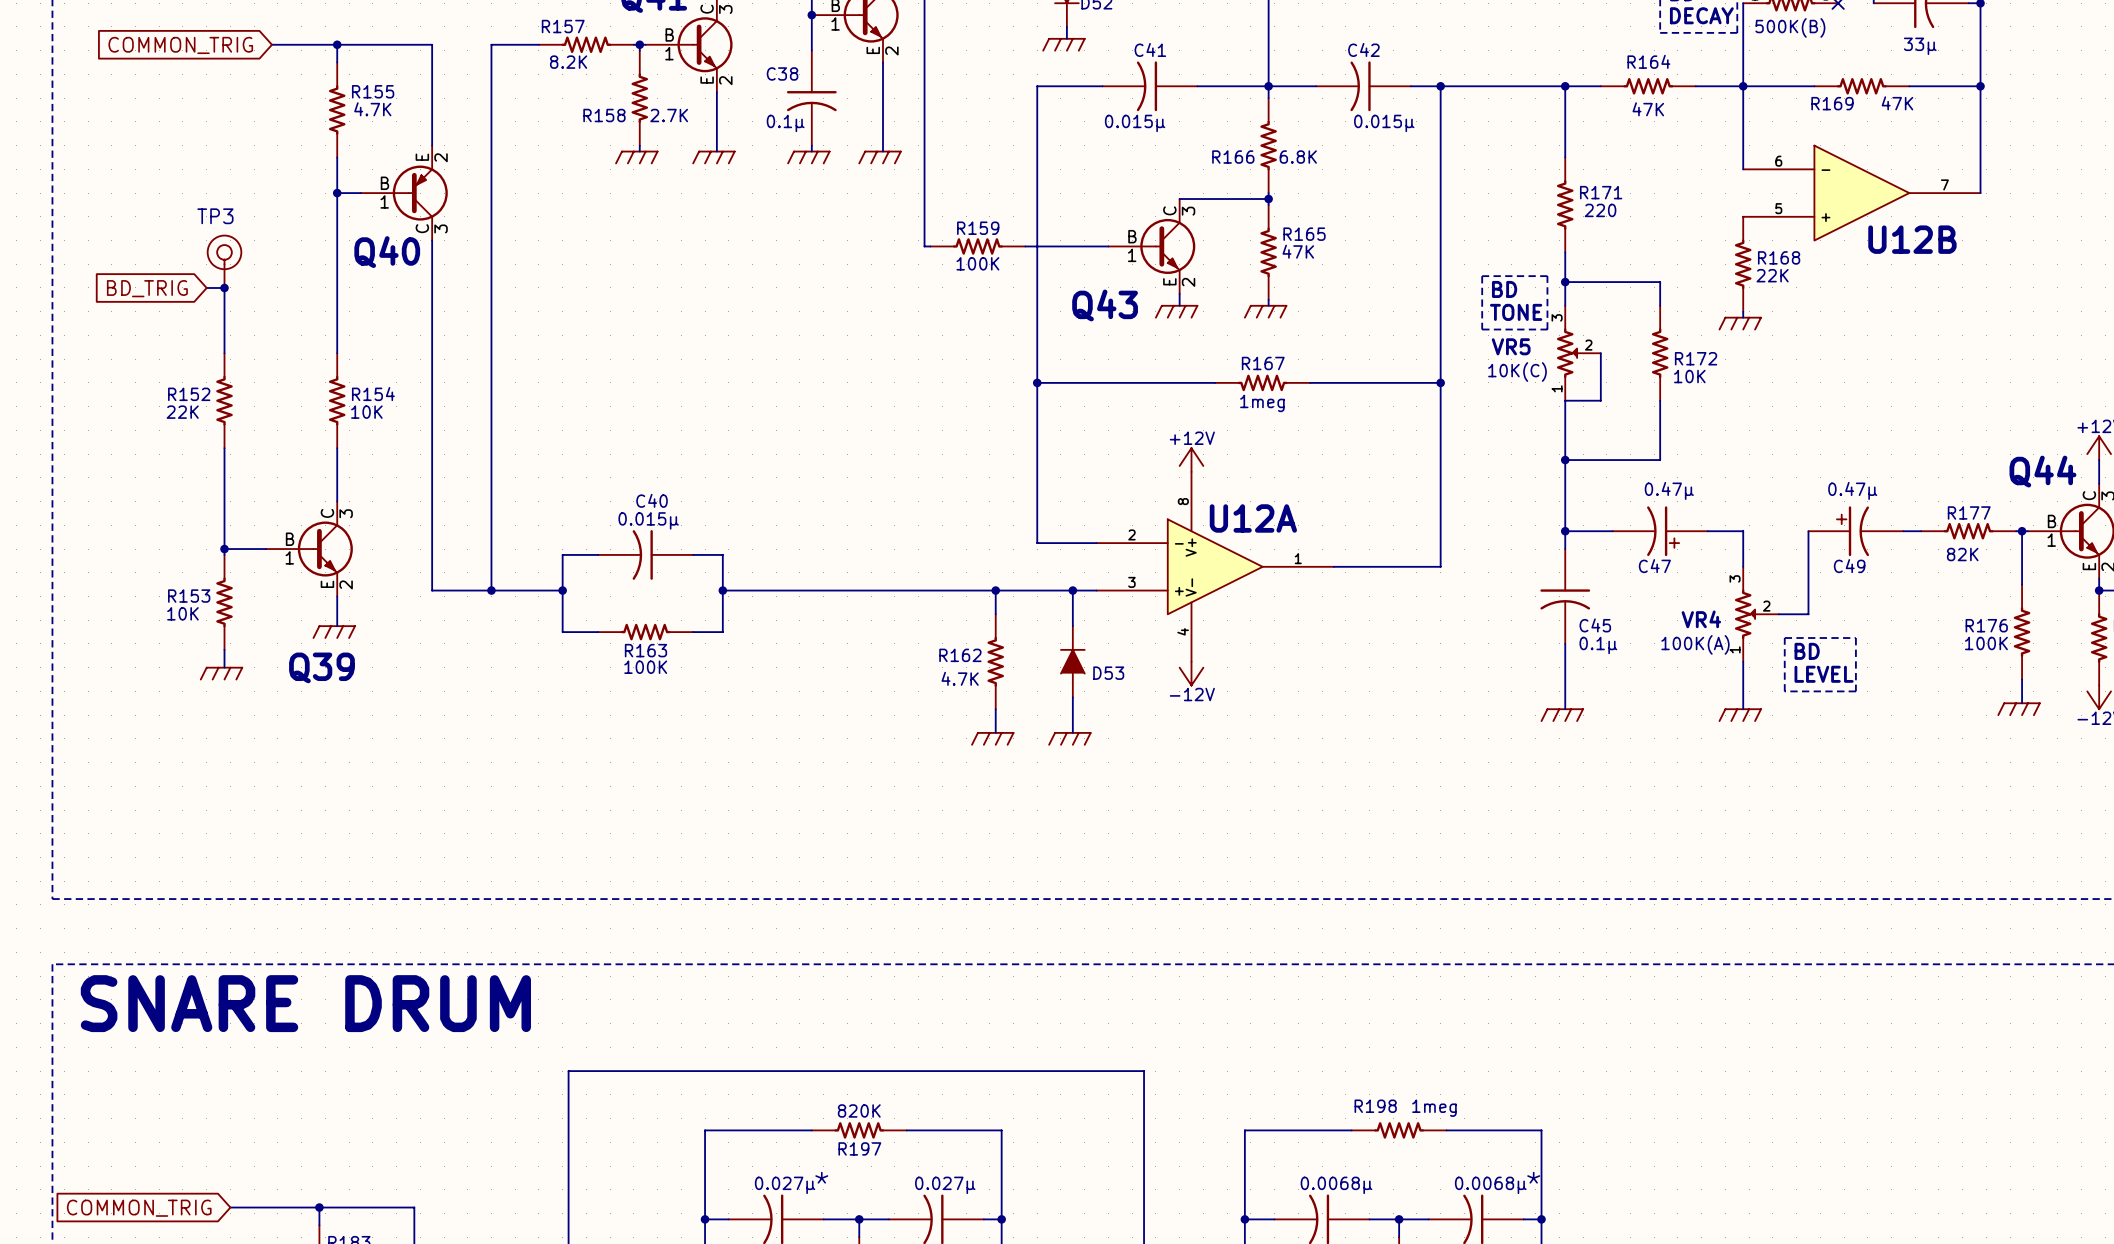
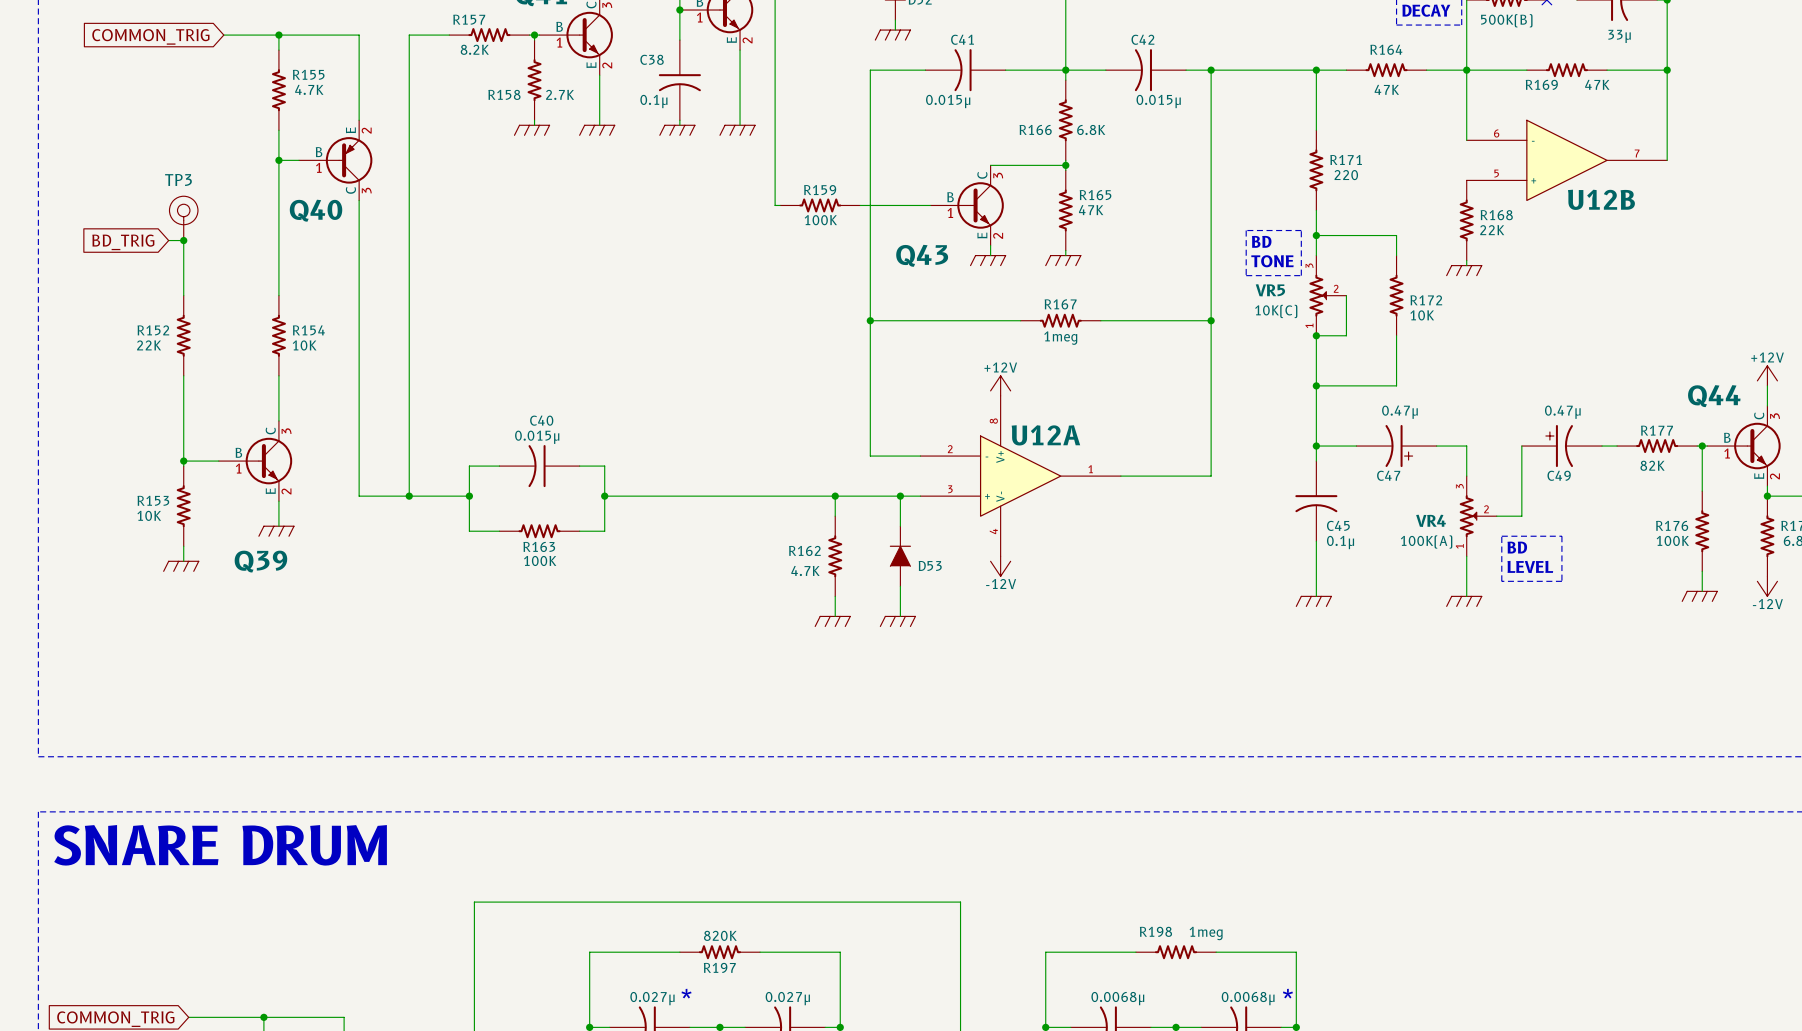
junction: none -> (1316, 335)

